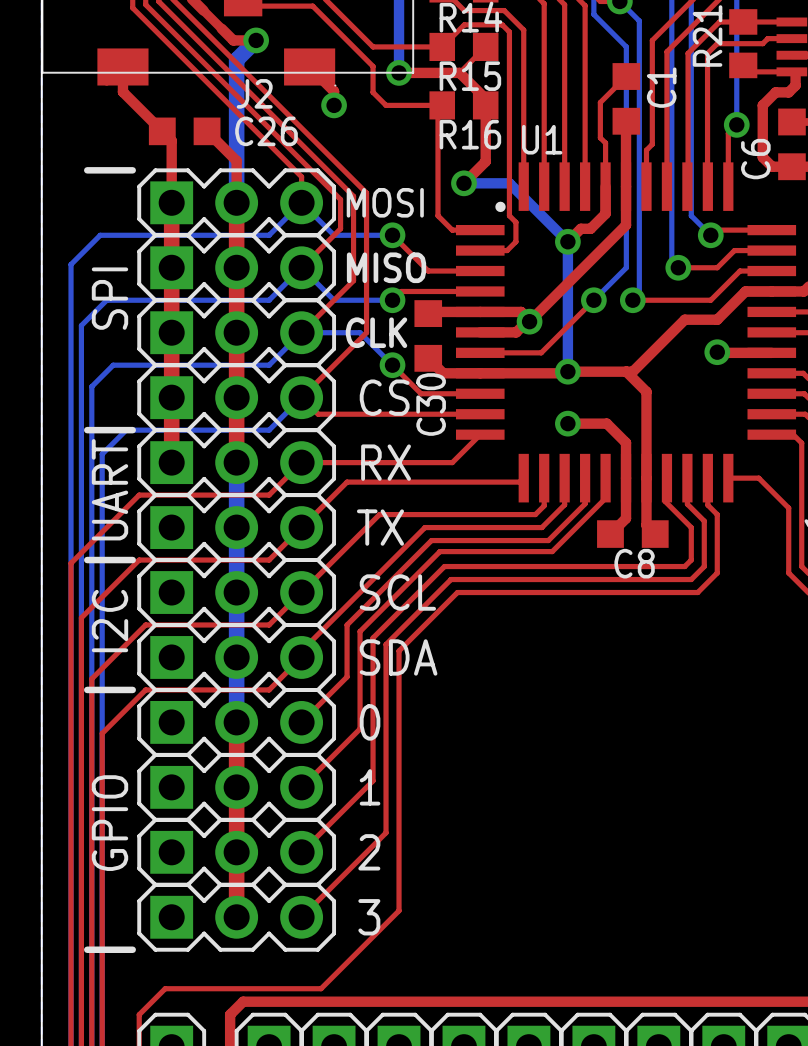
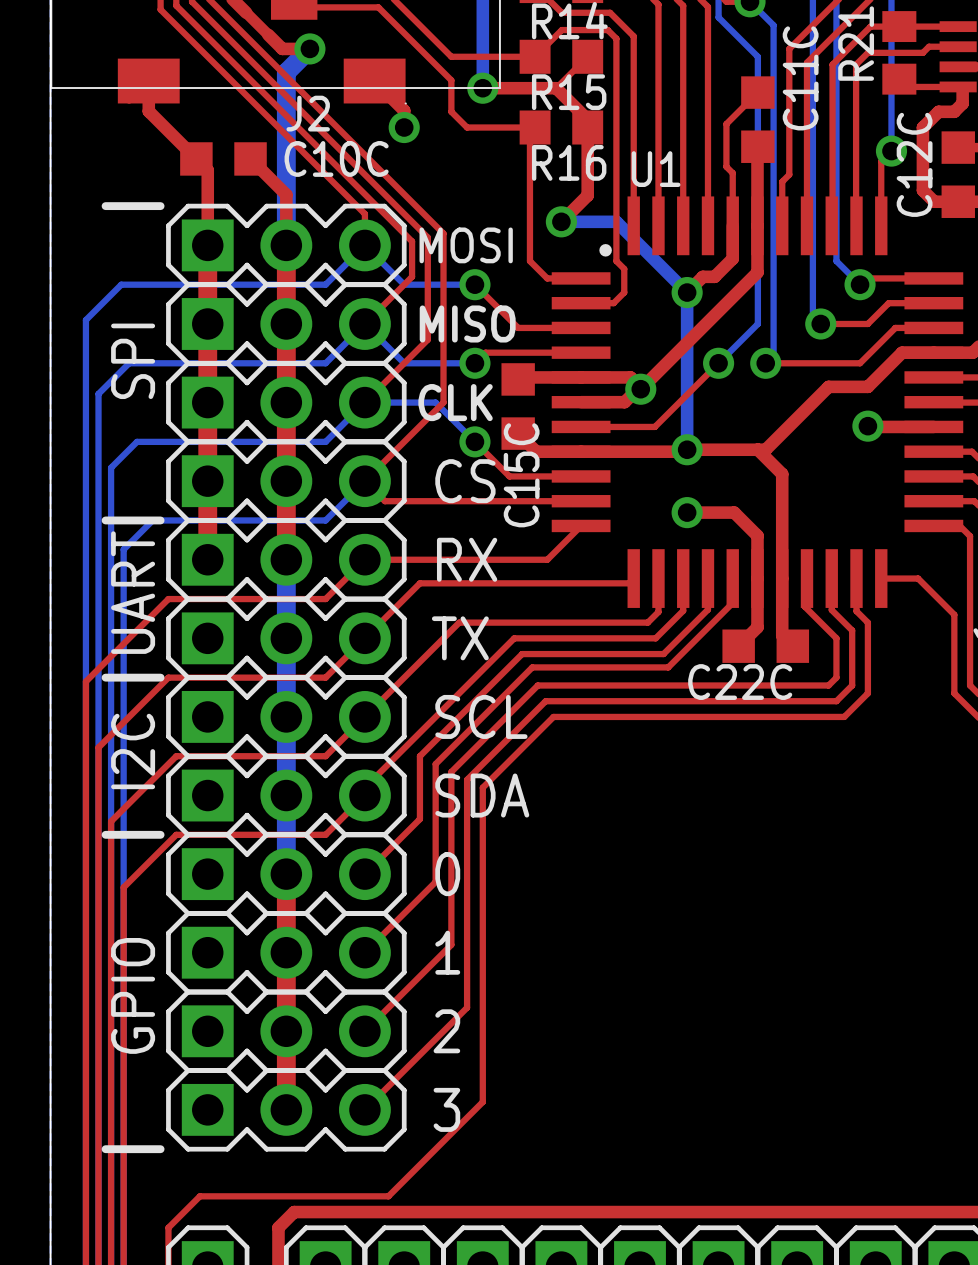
C1 name: C1 (661, 87) -> C11C (800, 78)
C26 name: C26 (266, 131) -> C10C (336, 158)
C6 name: C6 (755, 159) -> C12C (914, 164)
C30 name: C30 (431, 404) -> C15C (521, 475)
C8 name: C8 (634, 563) -> C22C (740, 682)

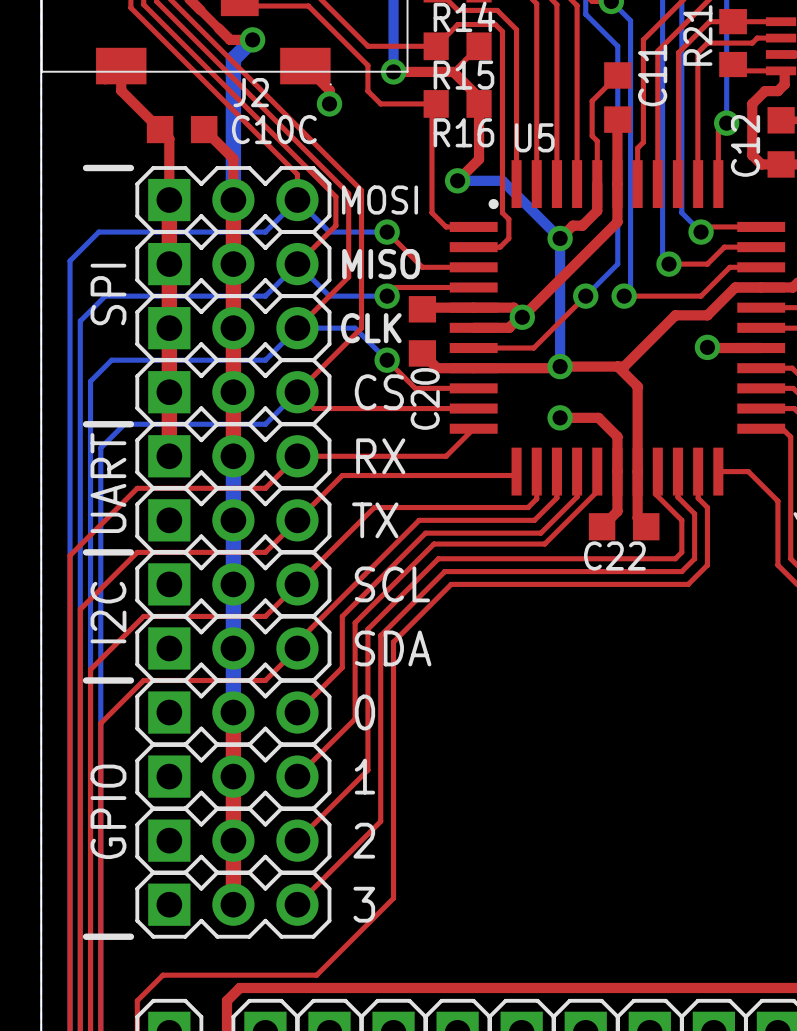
C11C name: C11C (800, 78) -> C11 (652, 75)
C12C name: C12C (914, 164) -> C12 (745, 145)
U1 name: U1 (656, 169) -> U5 (534, 137)
C15C name: C15C (521, 475) -> C20 (425, 398)
C22C name: C22C (740, 682) -> C22 (614, 555)

